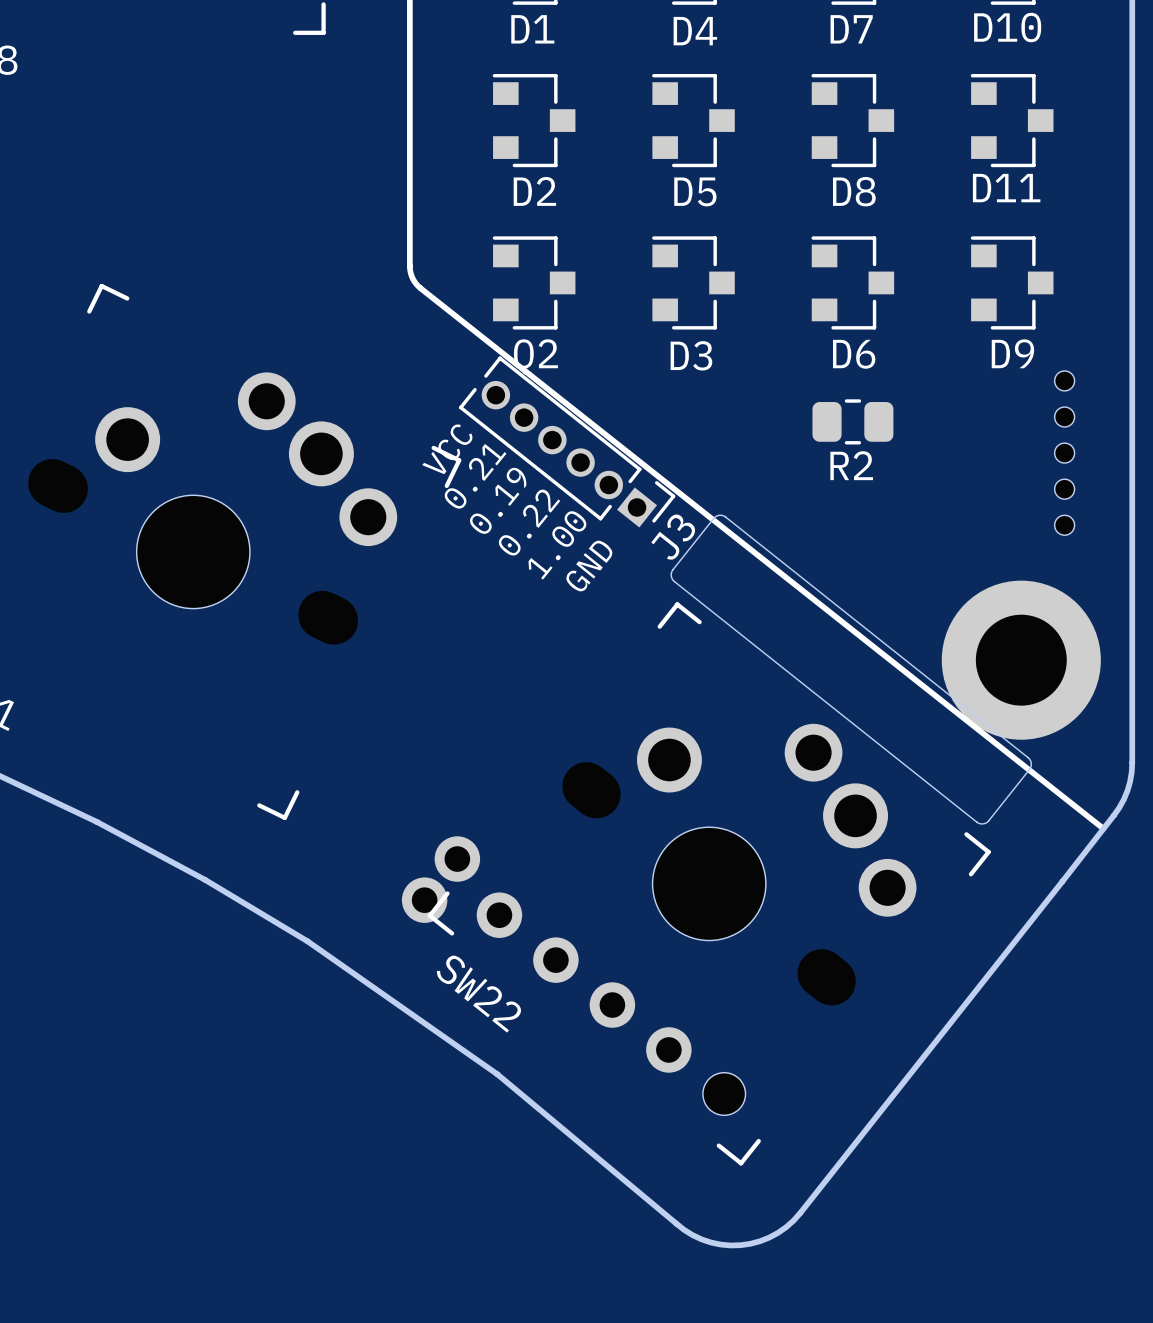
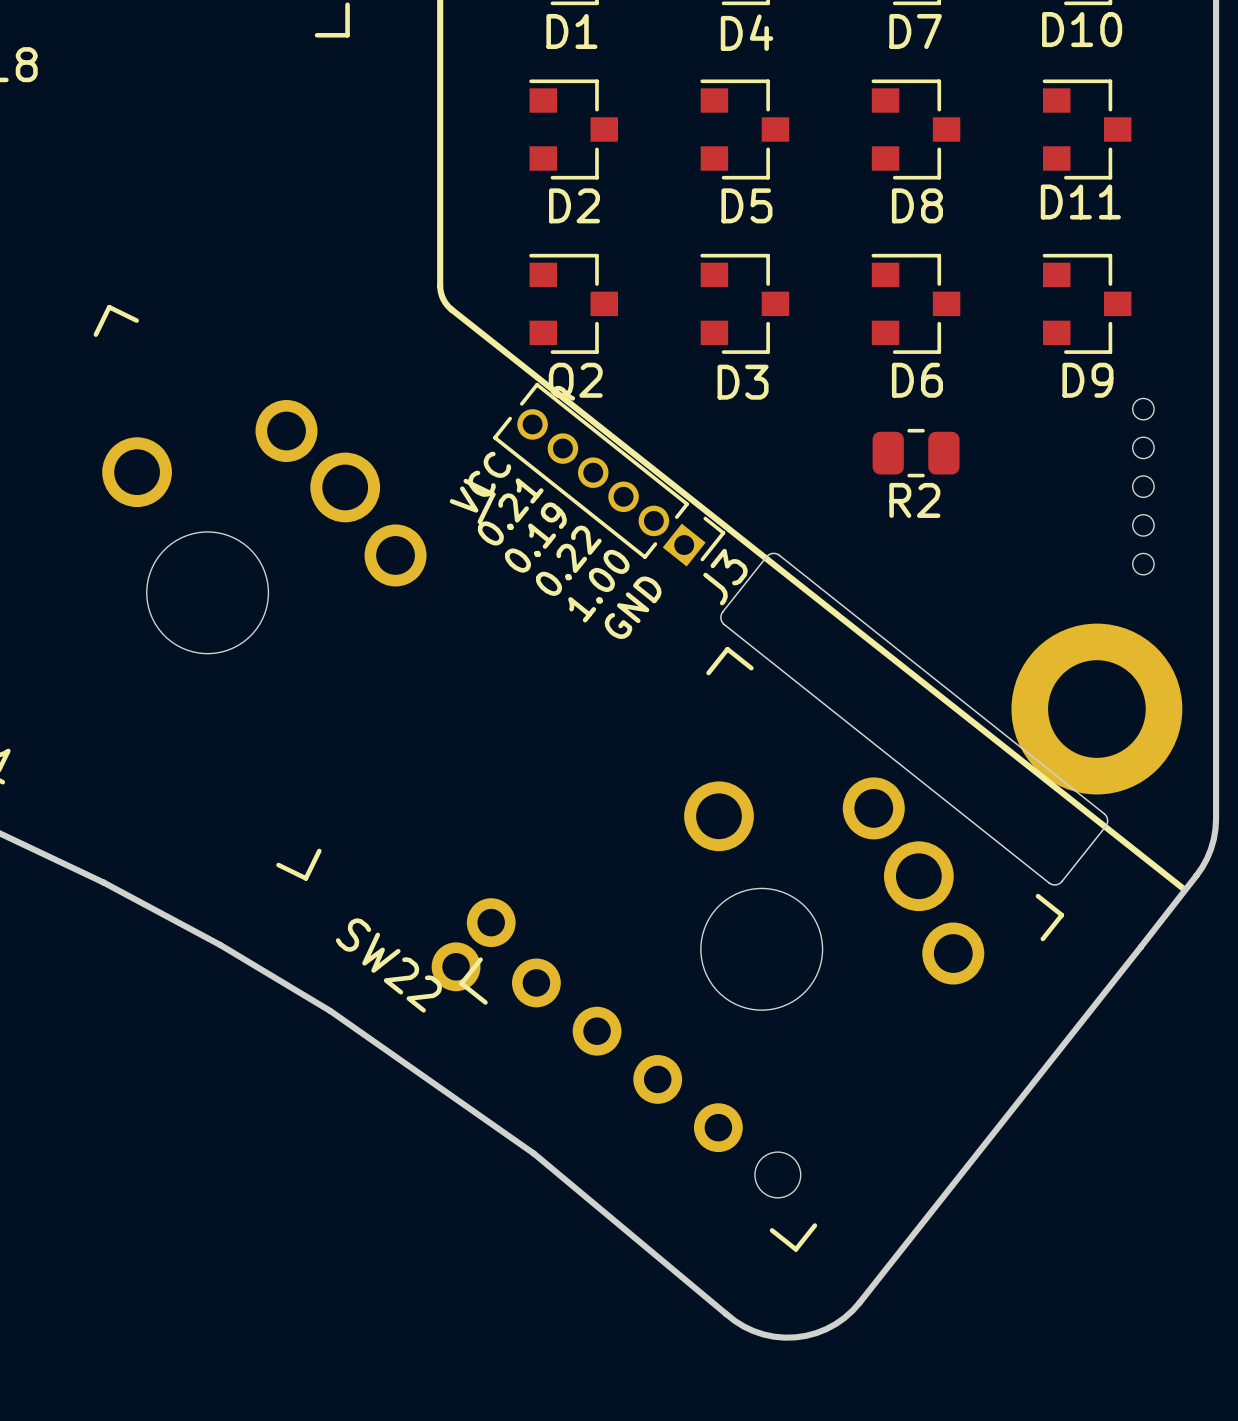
SW22 name position: SW22 (478, 994) -> SW22 (388, 965)

